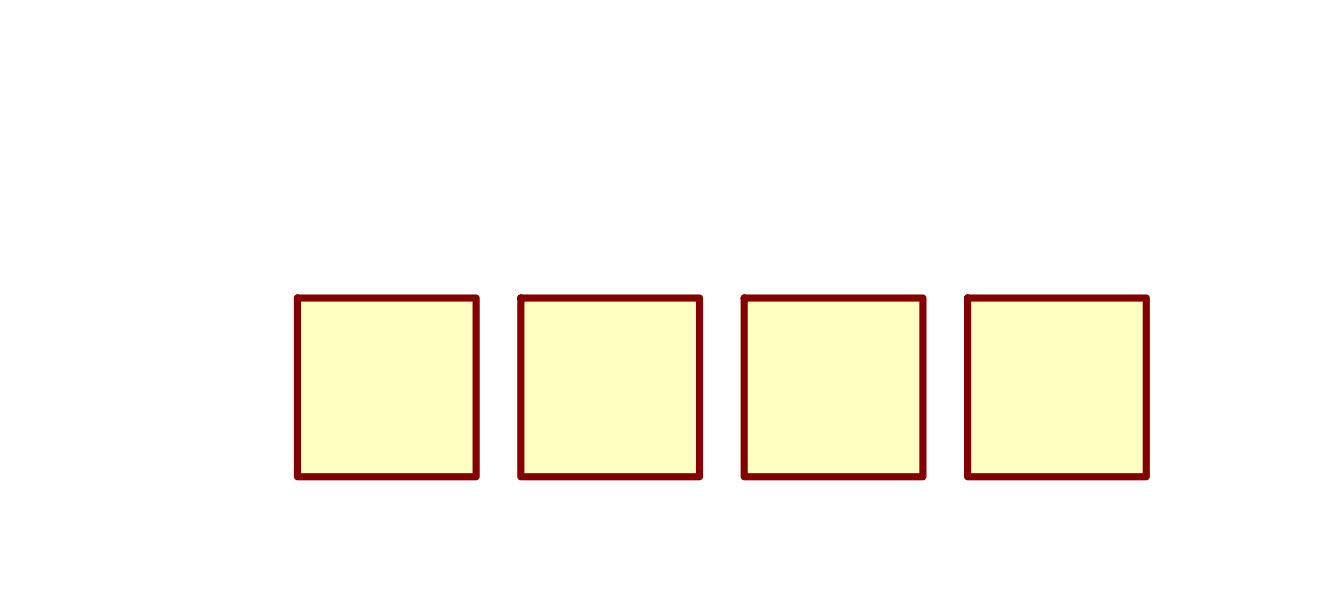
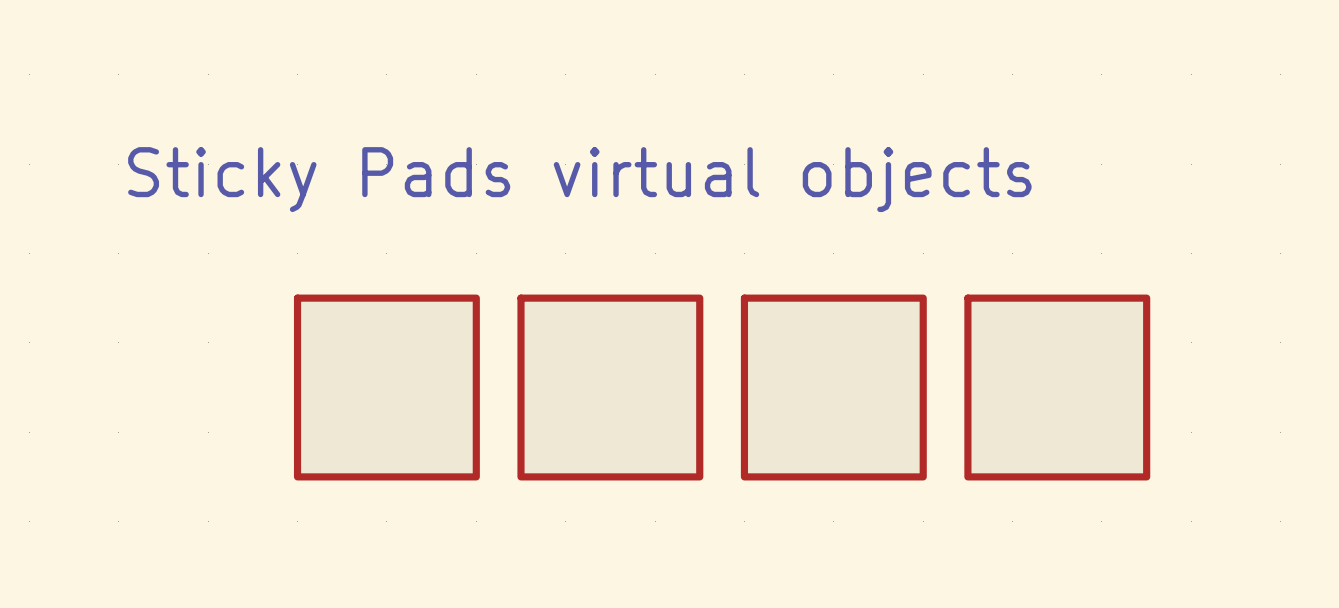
text: none -> Sticky Pads virtual objects (579, 179)

